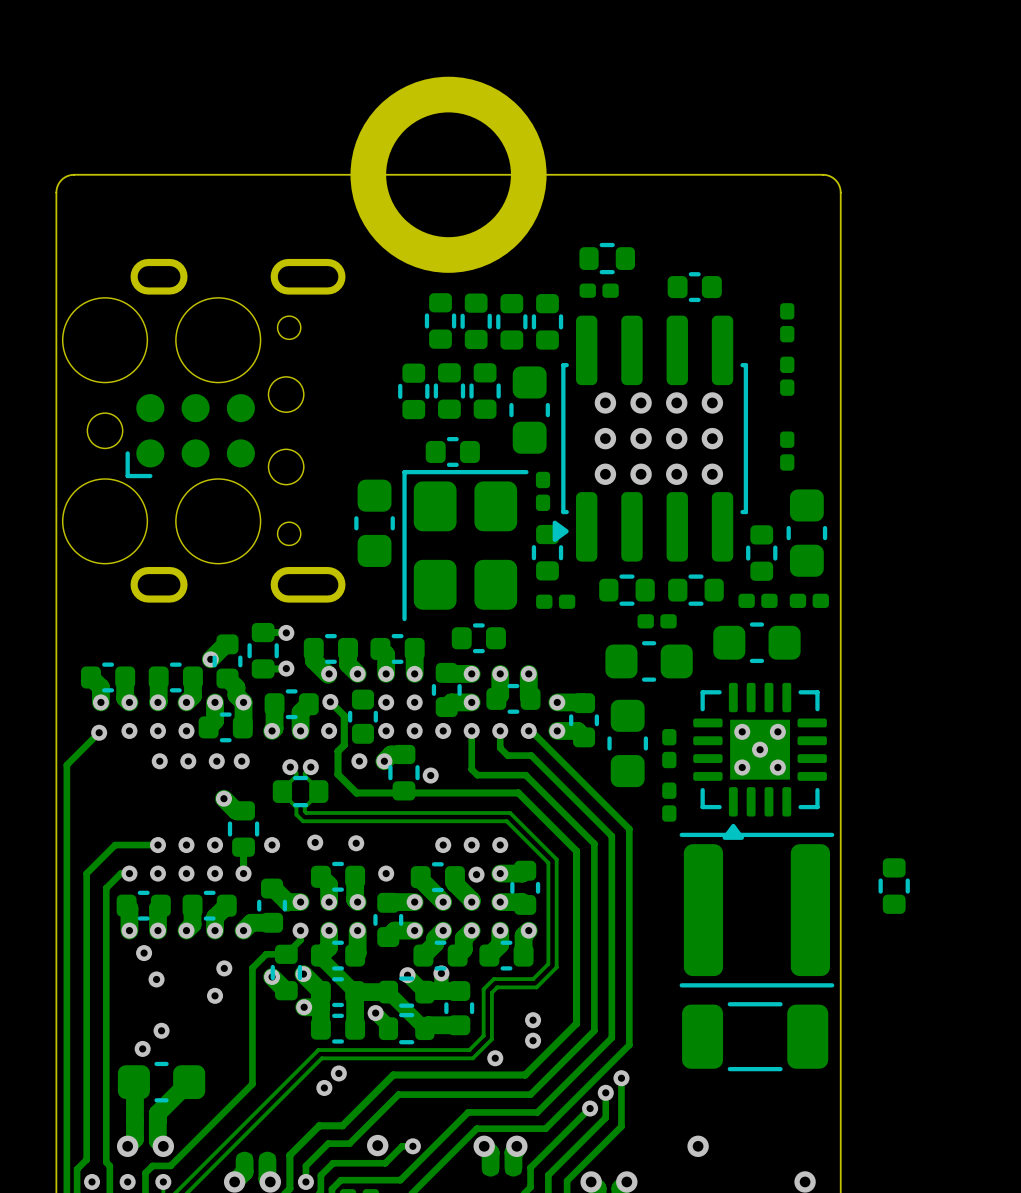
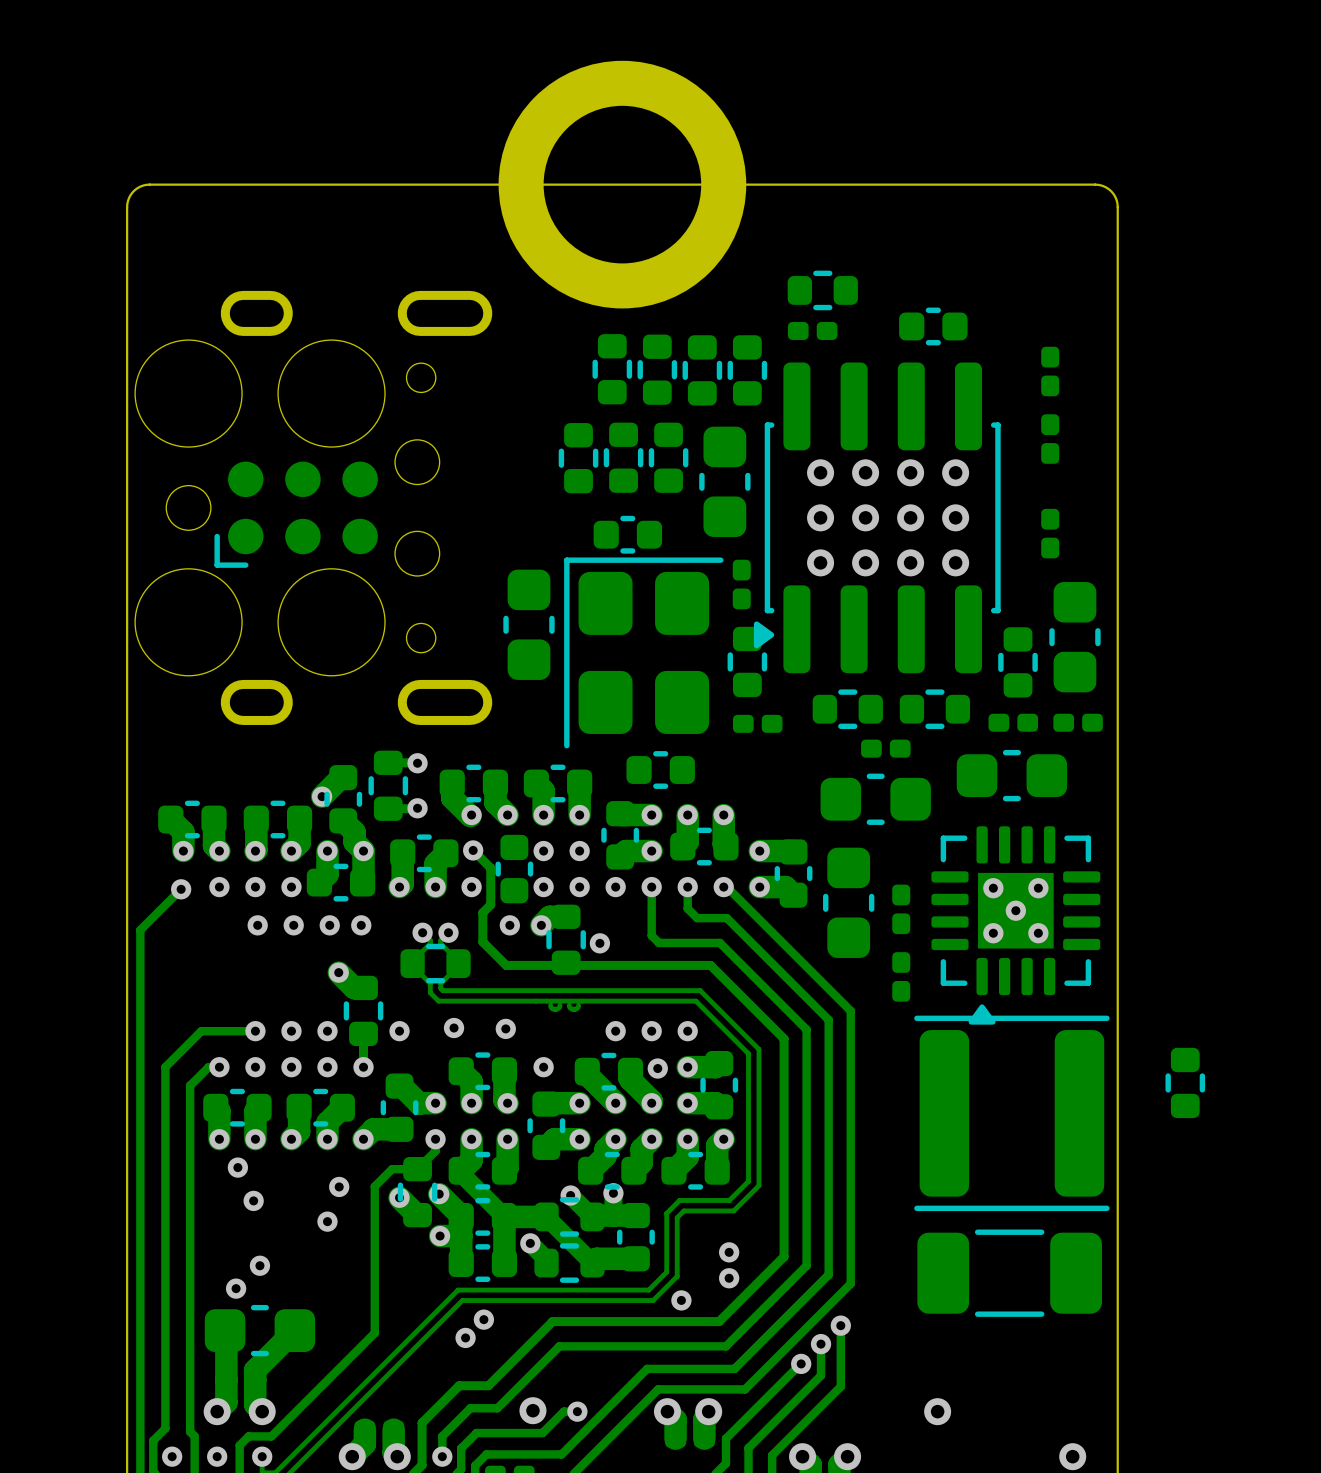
track: none -> (559, 1005) (556, 1009) (552, 1008) (550, 1005)
track: none -> (578, 1005) (574, 1009) (571, 1008) (569, 1005)

